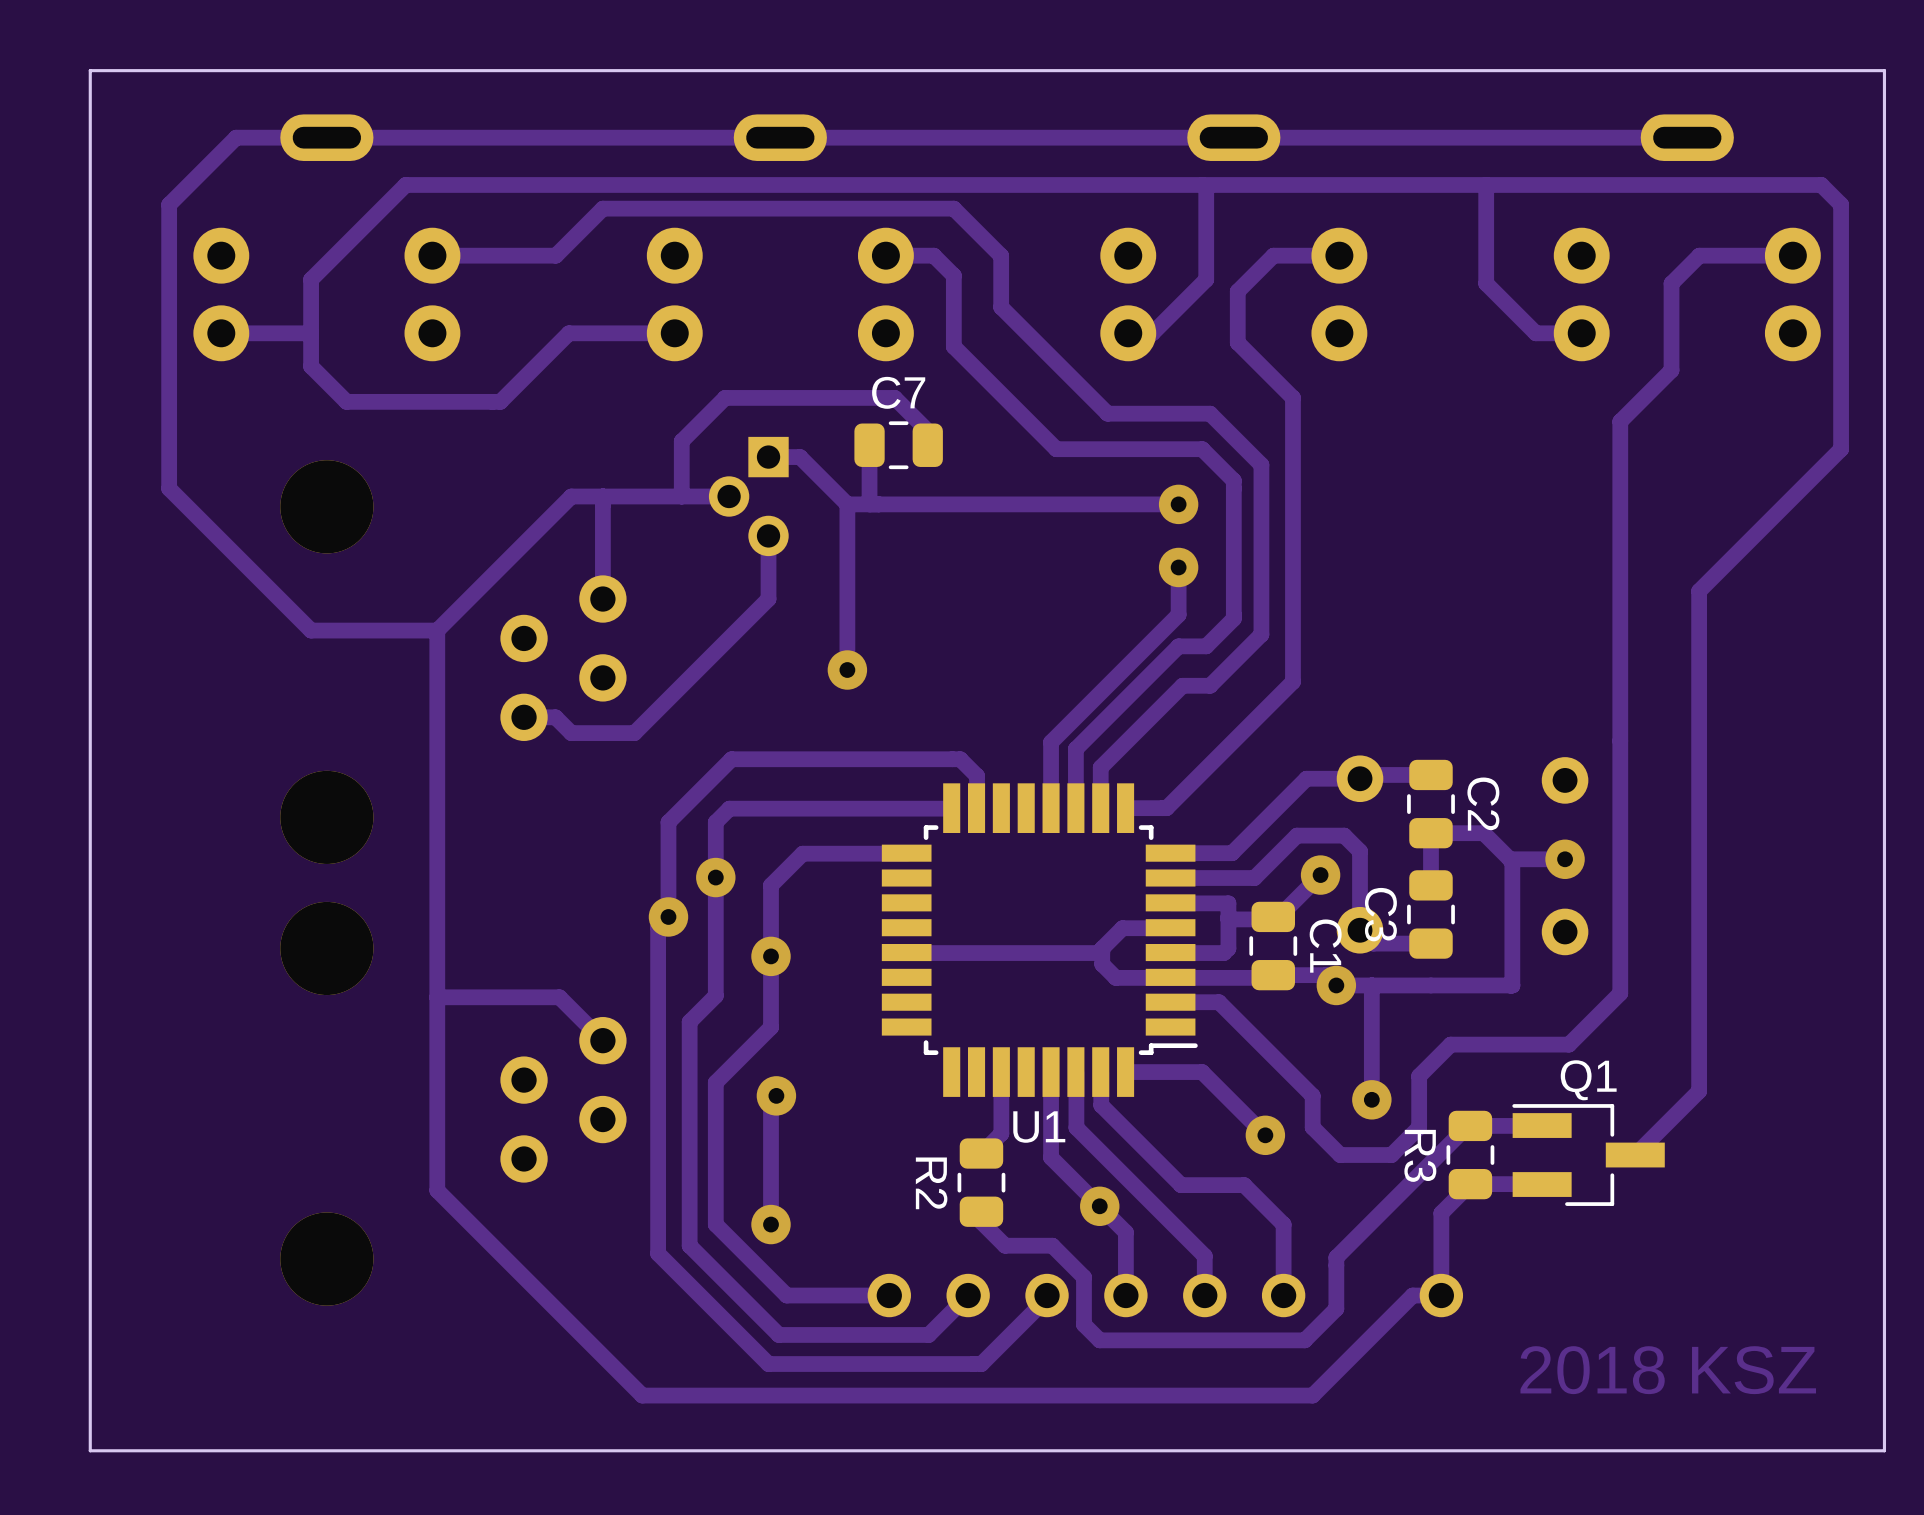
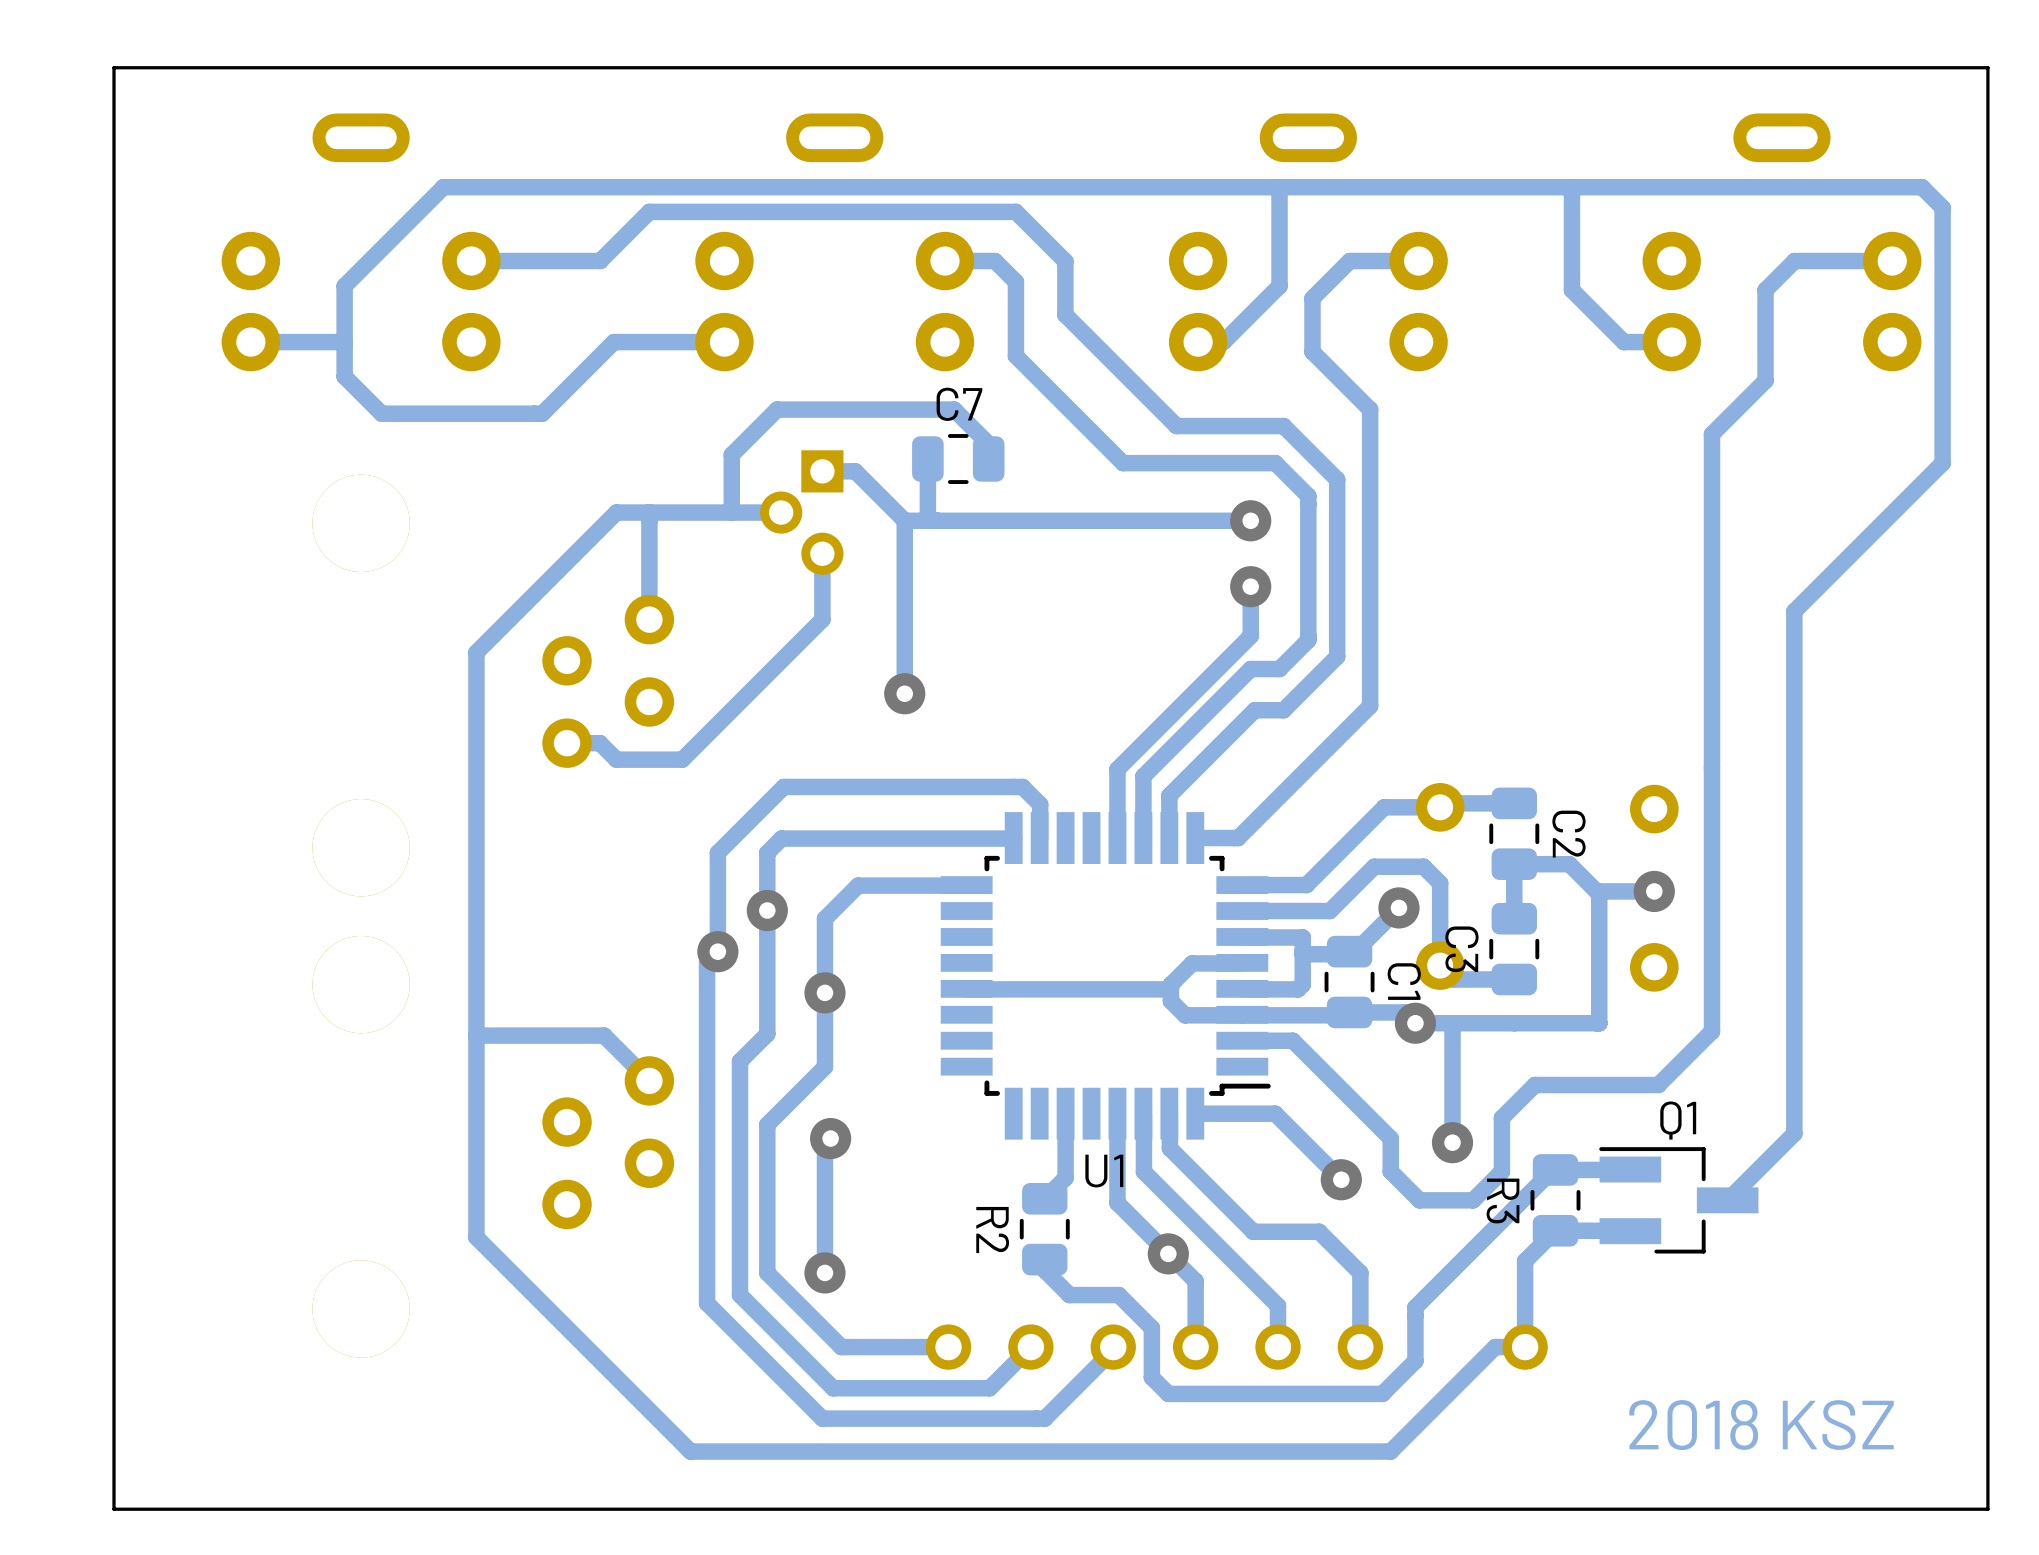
track: (1687, 137) (236, 137) (169, 204) (169, 488) (311, 630) (437, 630) -> none

